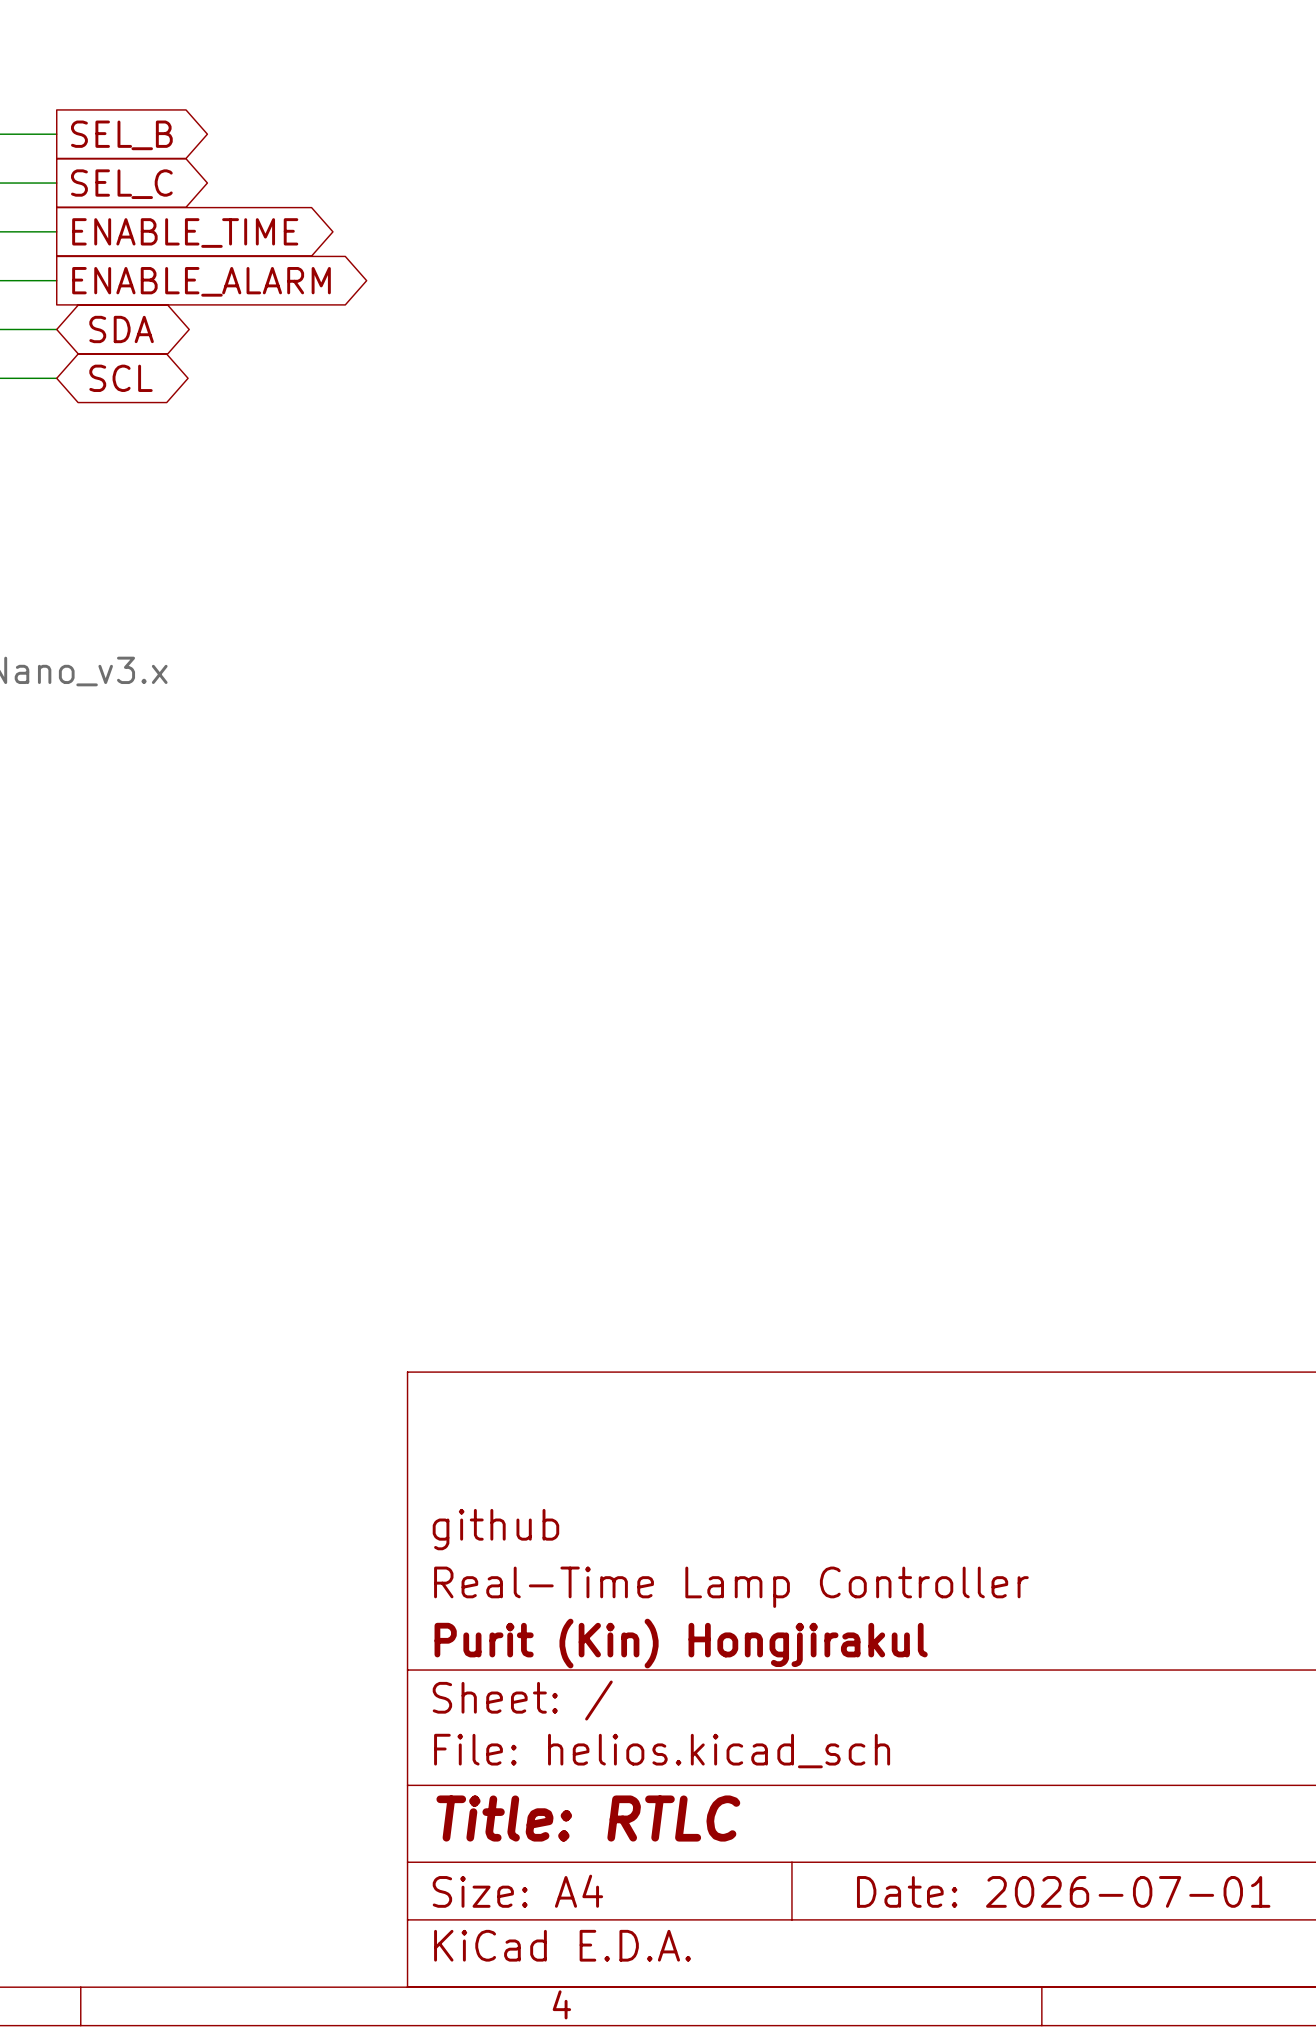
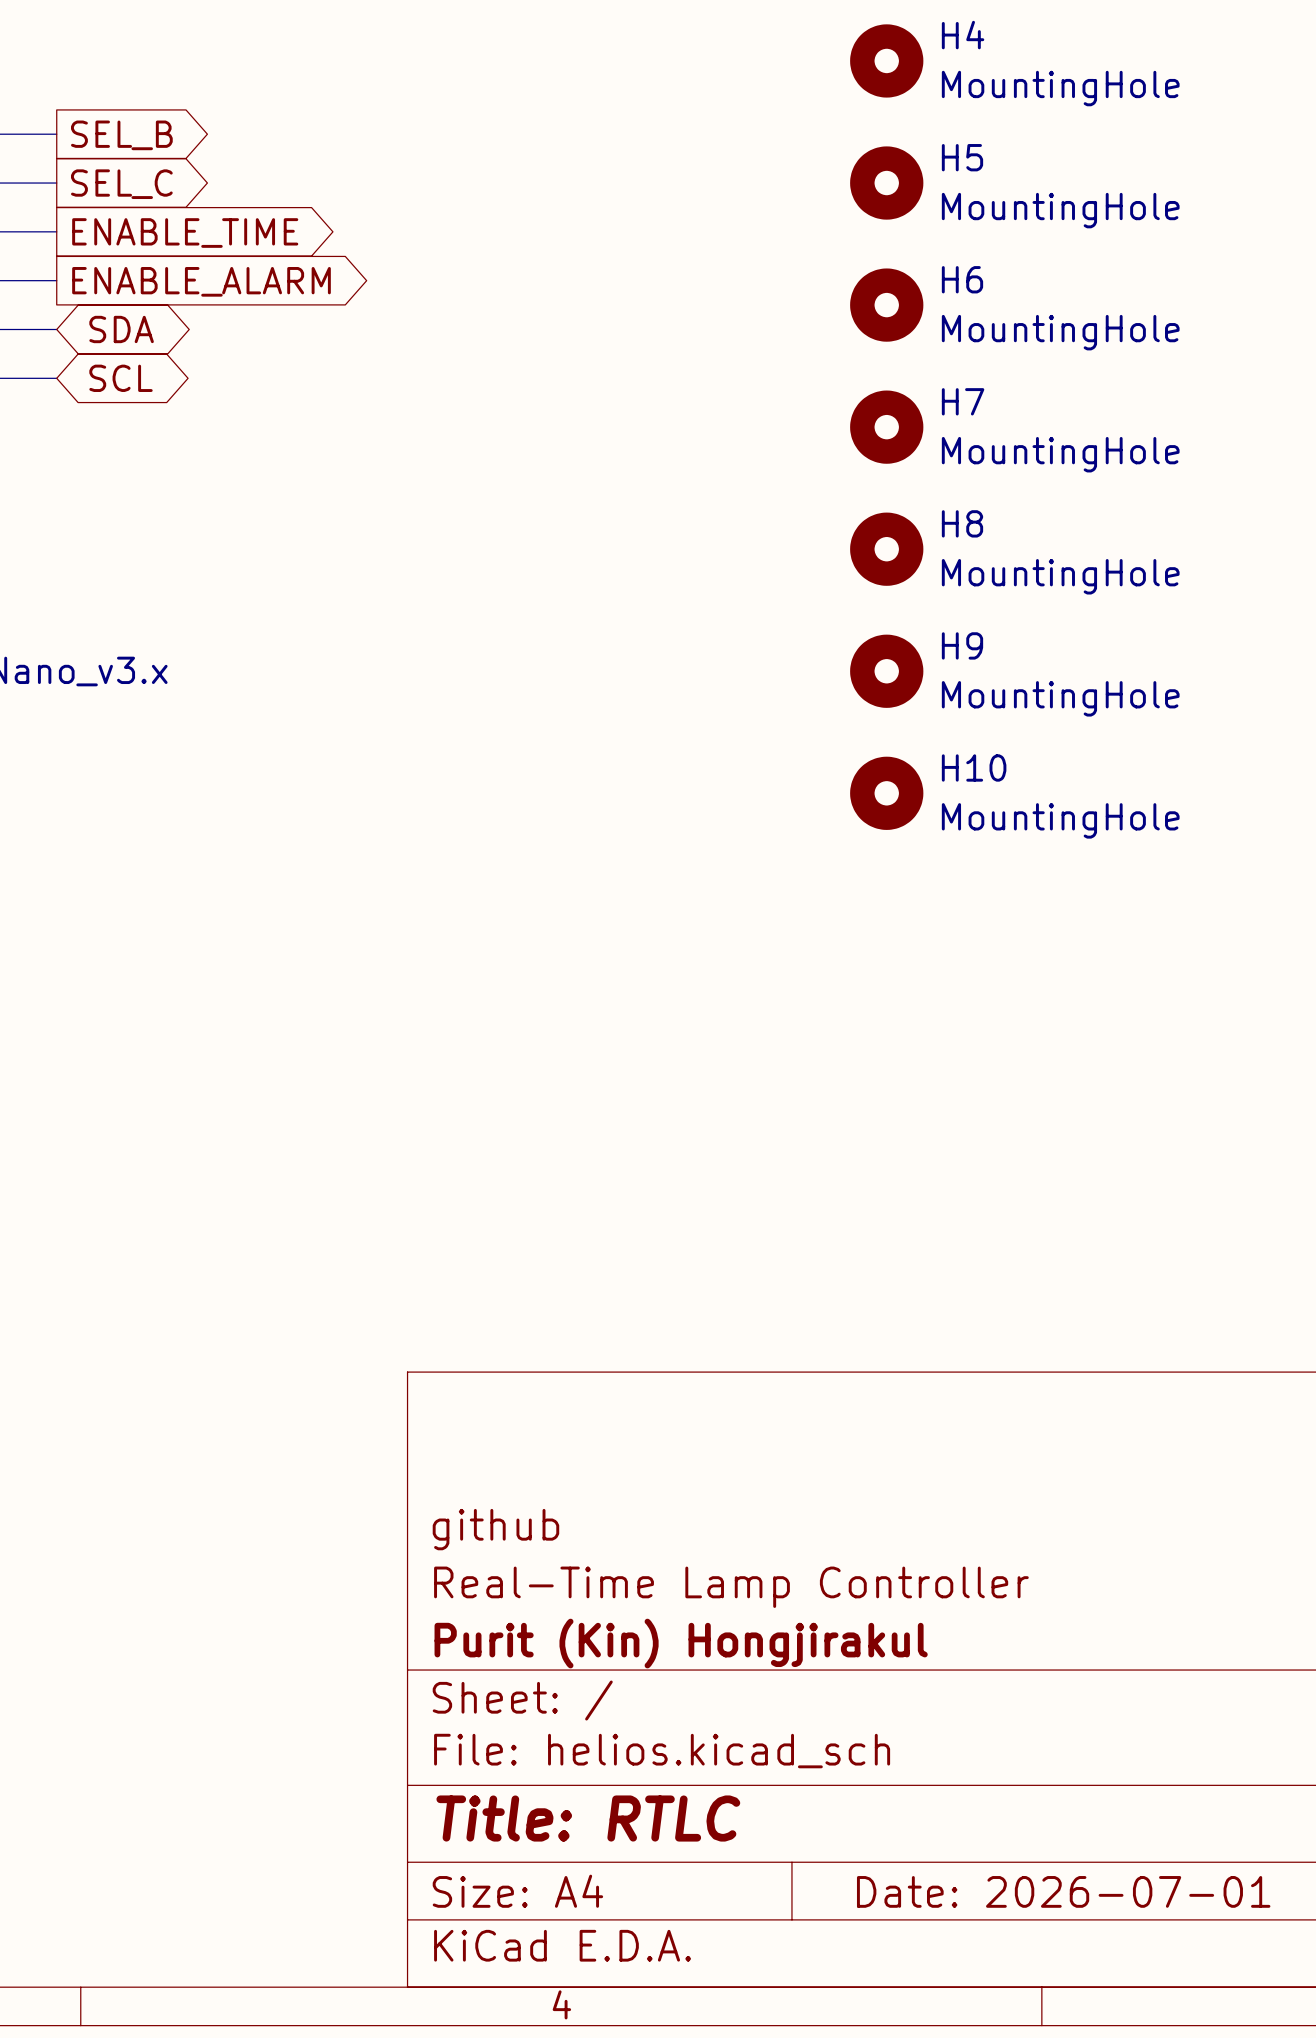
H4: none -> MountingHole (886, 60)
H5: none -> MountingHole (886, 183)
H6: none -> MountingHole (886, 305)
H7: none -> MountingHole (886, 427)
H8: none -> MountingHole (886, 549)
H9: none -> MountingHole (886, 671)
H10: none -> MountingHole (886, 793)

